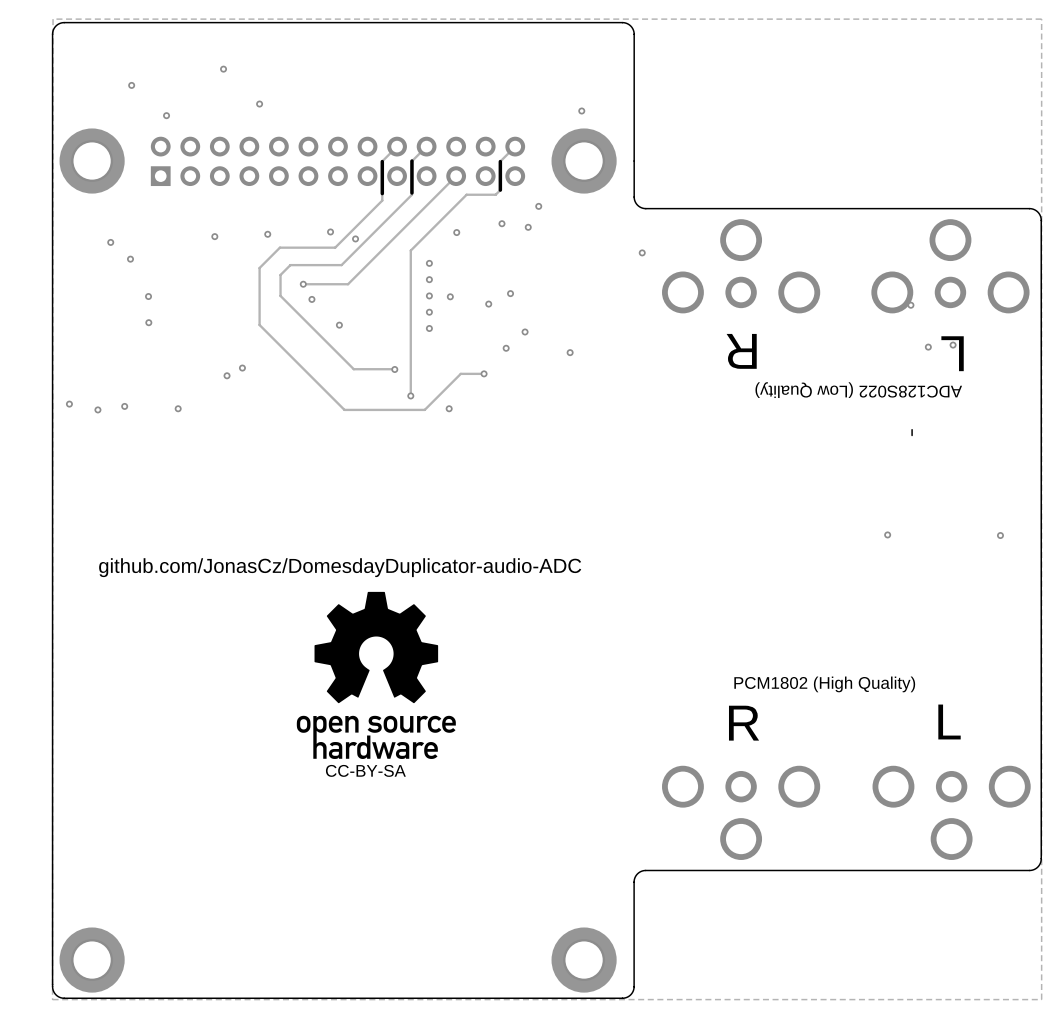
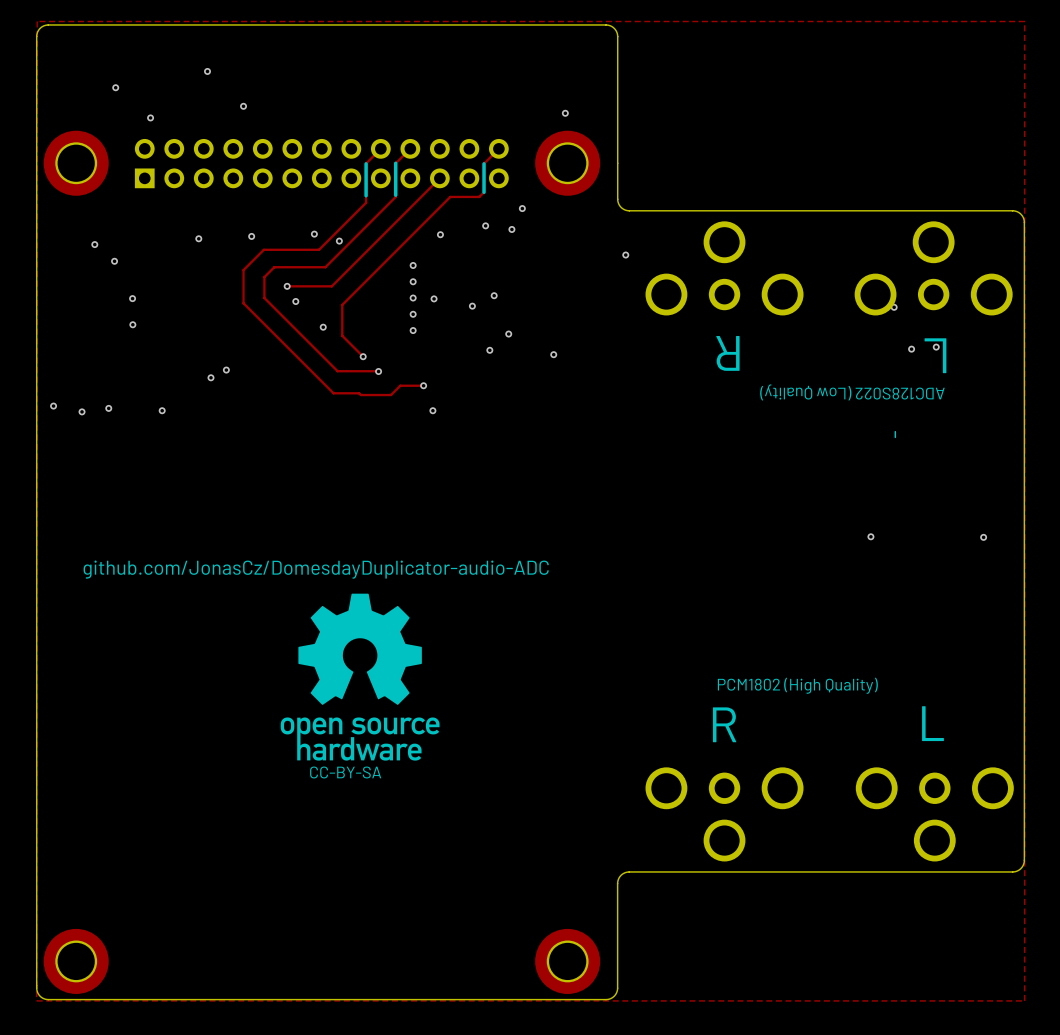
track: (410, 250) (410, 395) -> (394, 252) (342, 304) (342, 335) (363, 356)
track: (259, 301) (259, 325) (344, 409) (424, 409) (460, 373) (484, 373) -> (243, 303) (333, 393) (391, 395) (400, 385) (423, 385)
via: none -> (363, 356)
via: (484, 373) -> none
via: none -> (423, 385)
via: (410, 395) -> none

